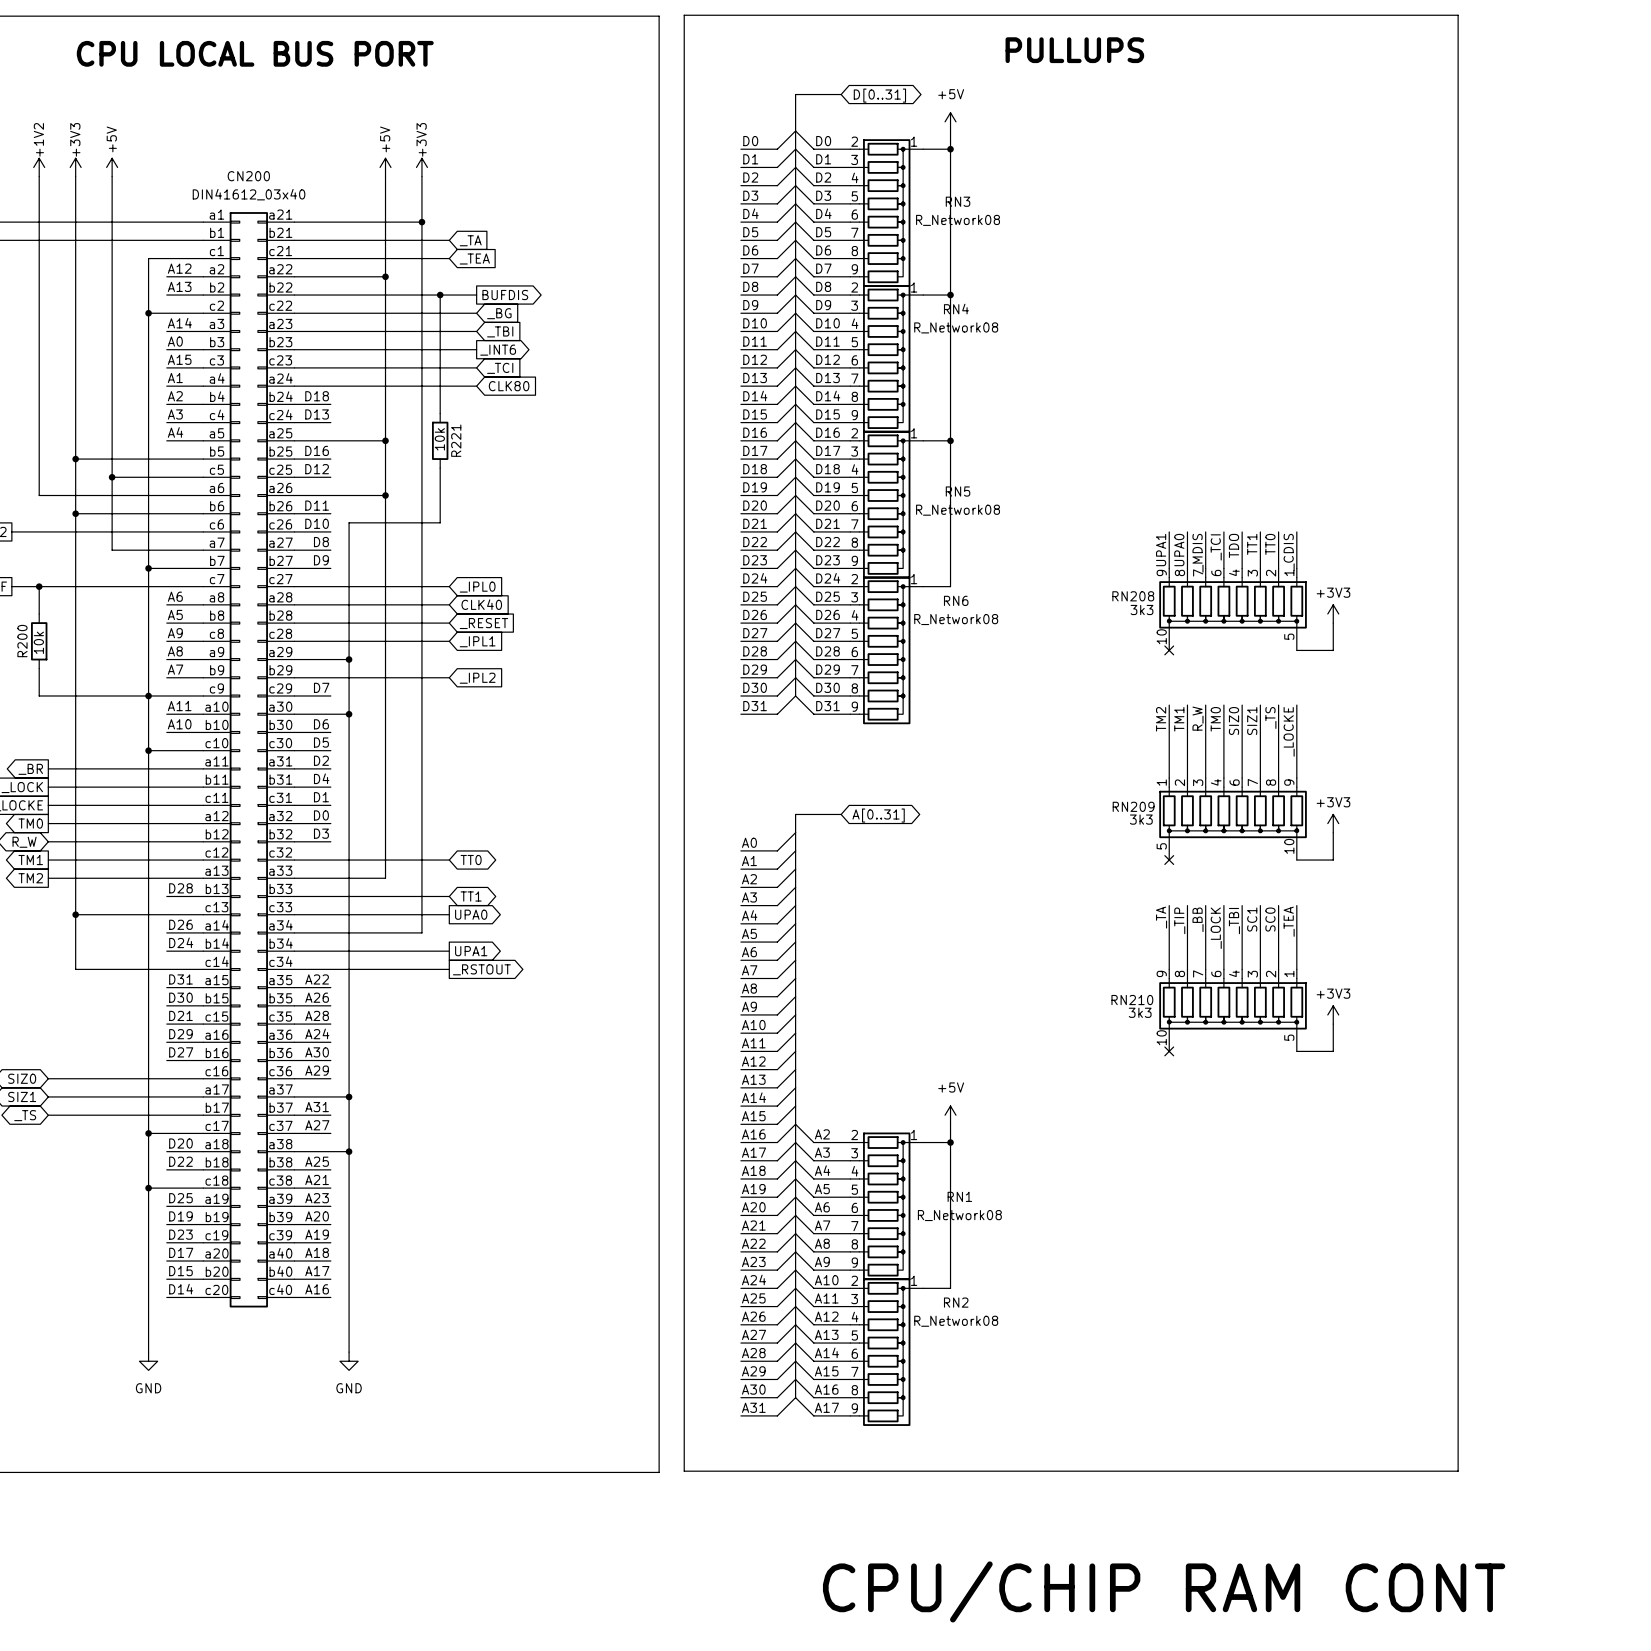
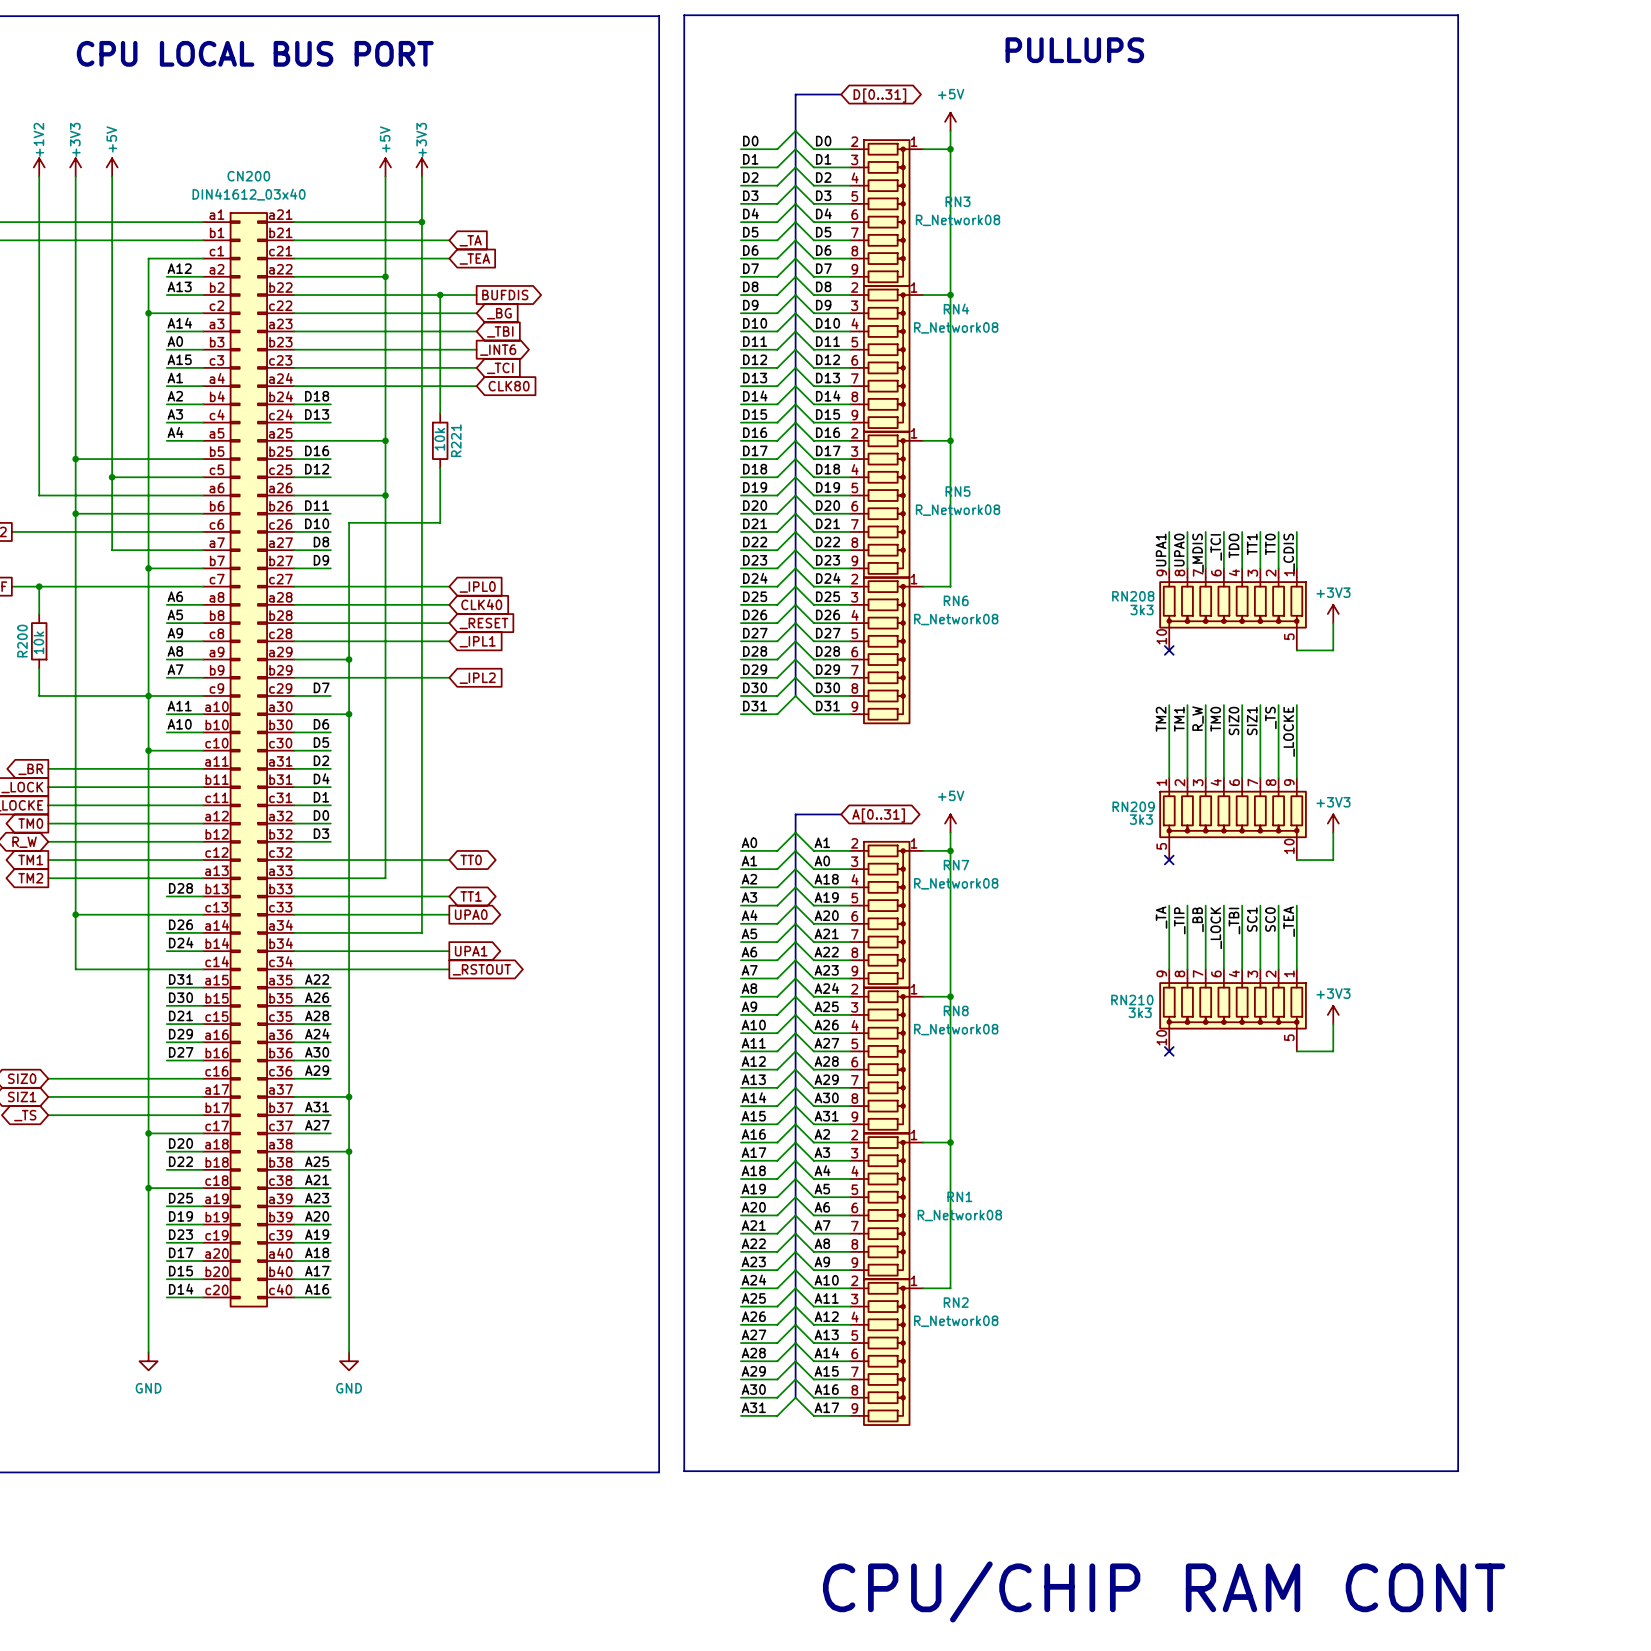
power symbol: none -> +5V (950, 823)
wire: none -> (795, 832) (813, 850) (850, 850)
wire: none -> (950, 832) (950, 1124)
label: none -> A1 (822, 842)
wire: none -> (795, 850) (813, 869) (850, 869)
wire: none -> (923, 850) (950, 850)
junction: none -> (950, 850)
label: none -> A0 (822, 861)
wire: none -> (795, 869) (813, 887) (850, 887)
label: none -> A18 (826, 879)
wire: none -> (795, 887) (813, 905) (850, 905)
label: none -> A19 (826, 897)
wire: none -> (795, 905) (813, 923) (850, 923)
RN7: none -> R_Network08 (886, 914)
label: none -> A20 (826, 915)
wire: none -> (795, 923) (813, 942) (850, 942)
label: none -> A21 (826, 933)
wire: none -> (795, 942) (813, 960) (850, 960)
label: none -> A22 (826, 952)
wire: none -> (795, 960) (813, 978) (850, 978)
label: none -> A23 (826, 970)
wire: none -> (795, 978) (813, 996) (850, 996)
label: none -> A24 (826, 988)
wire: none -> (795, 996) (813, 1014) (850, 1014)
wire: none -> (923, 996) (950, 996)
junction: none -> (950, 996)
label: none -> A25 (826, 1006)
wire: none -> (795, 1014) (813, 1033) (850, 1033)
label: none -> A26 (826, 1025)
wire: none -> (795, 1033) (813, 1051) (850, 1051)
label: none -> A27 (826, 1043)
wire: none -> (795, 1051) (813, 1069) (850, 1069)
RN8: none -> R_Network08 (886, 1060)
label: none -> A28 (826, 1061)
wire: none -> (795, 1069) (813, 1087) (850, 1087)
label: none -> A29 (826, 1079)
wire: none -> (795, 1087) (813, 1106) (850, 1106)
label: none -> A30 (826, 1097)
wire: none -> (795, 1106) (813, 1124) (850, 1124)
power symbol: +5V (950, 1115) -> none
label: none -> A31 (826, 1116)

